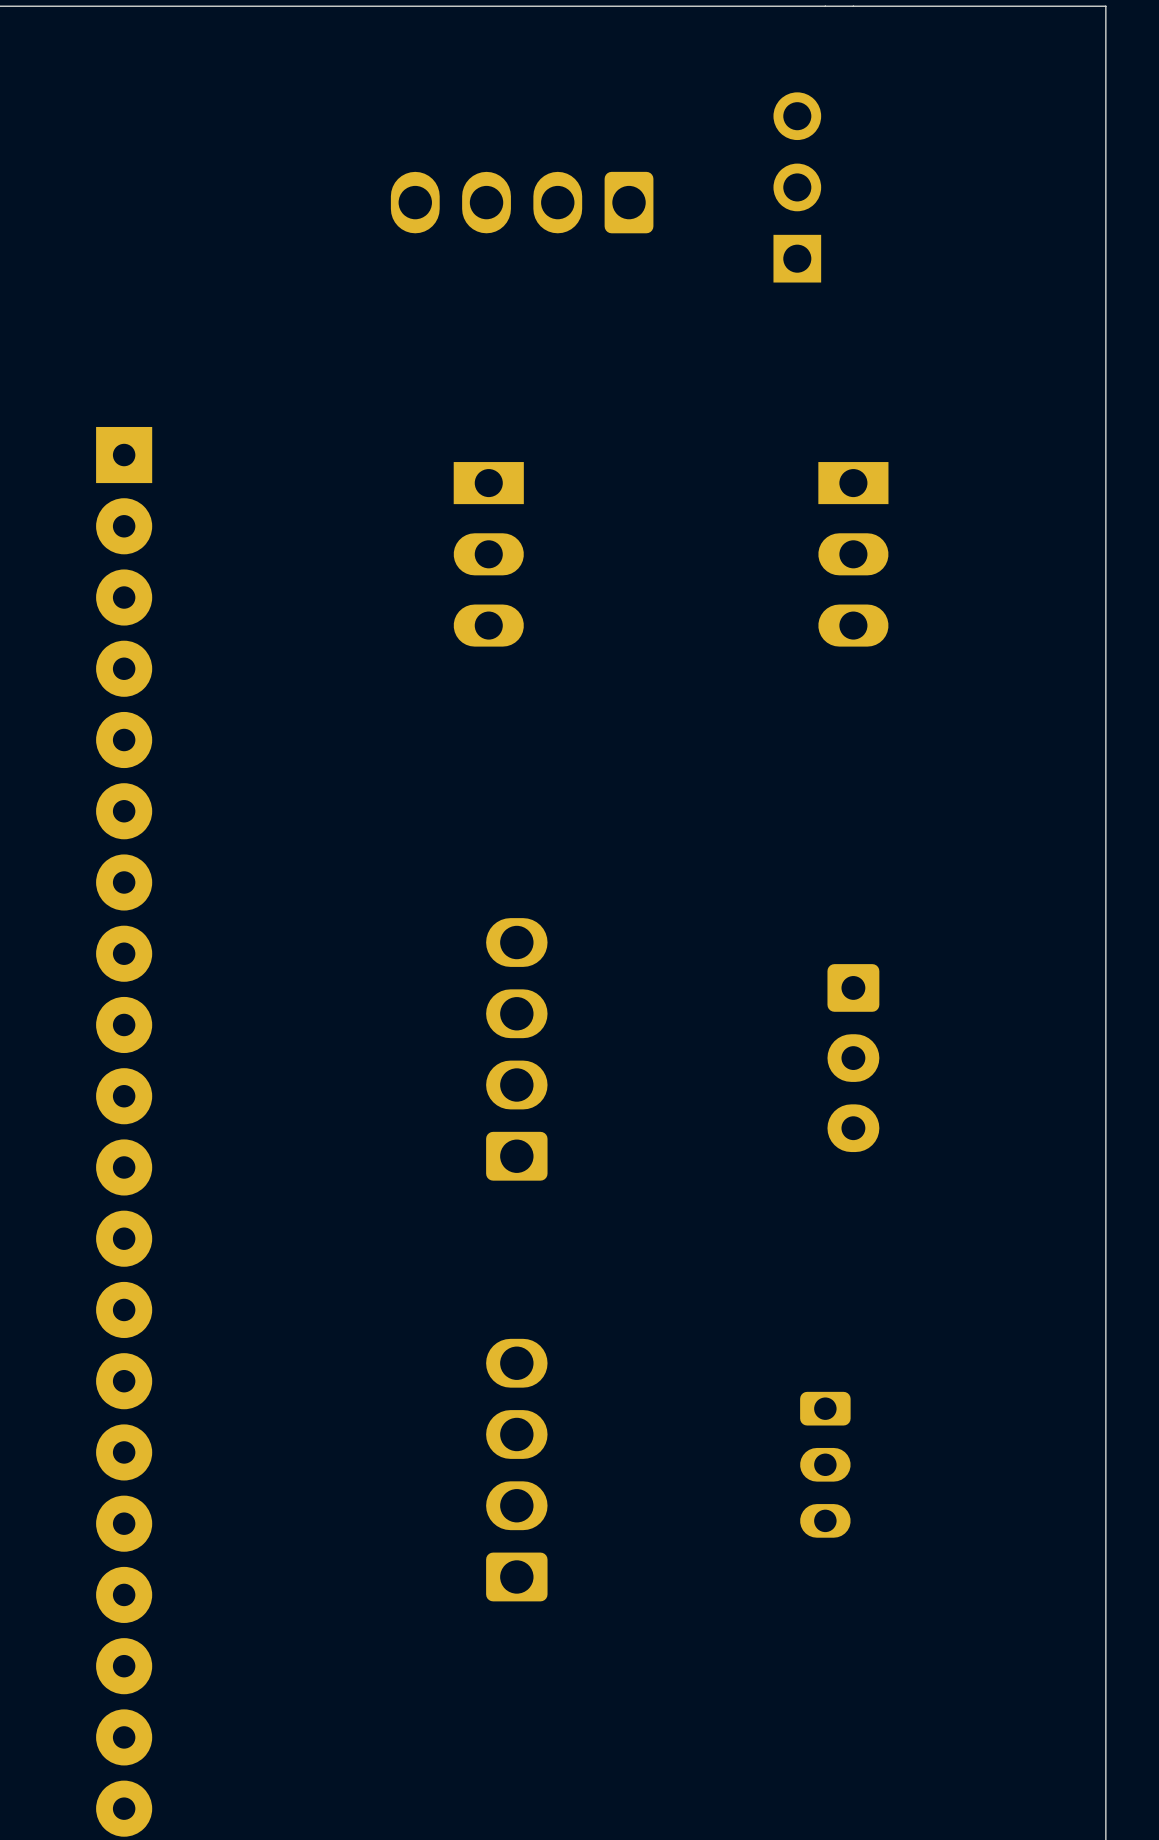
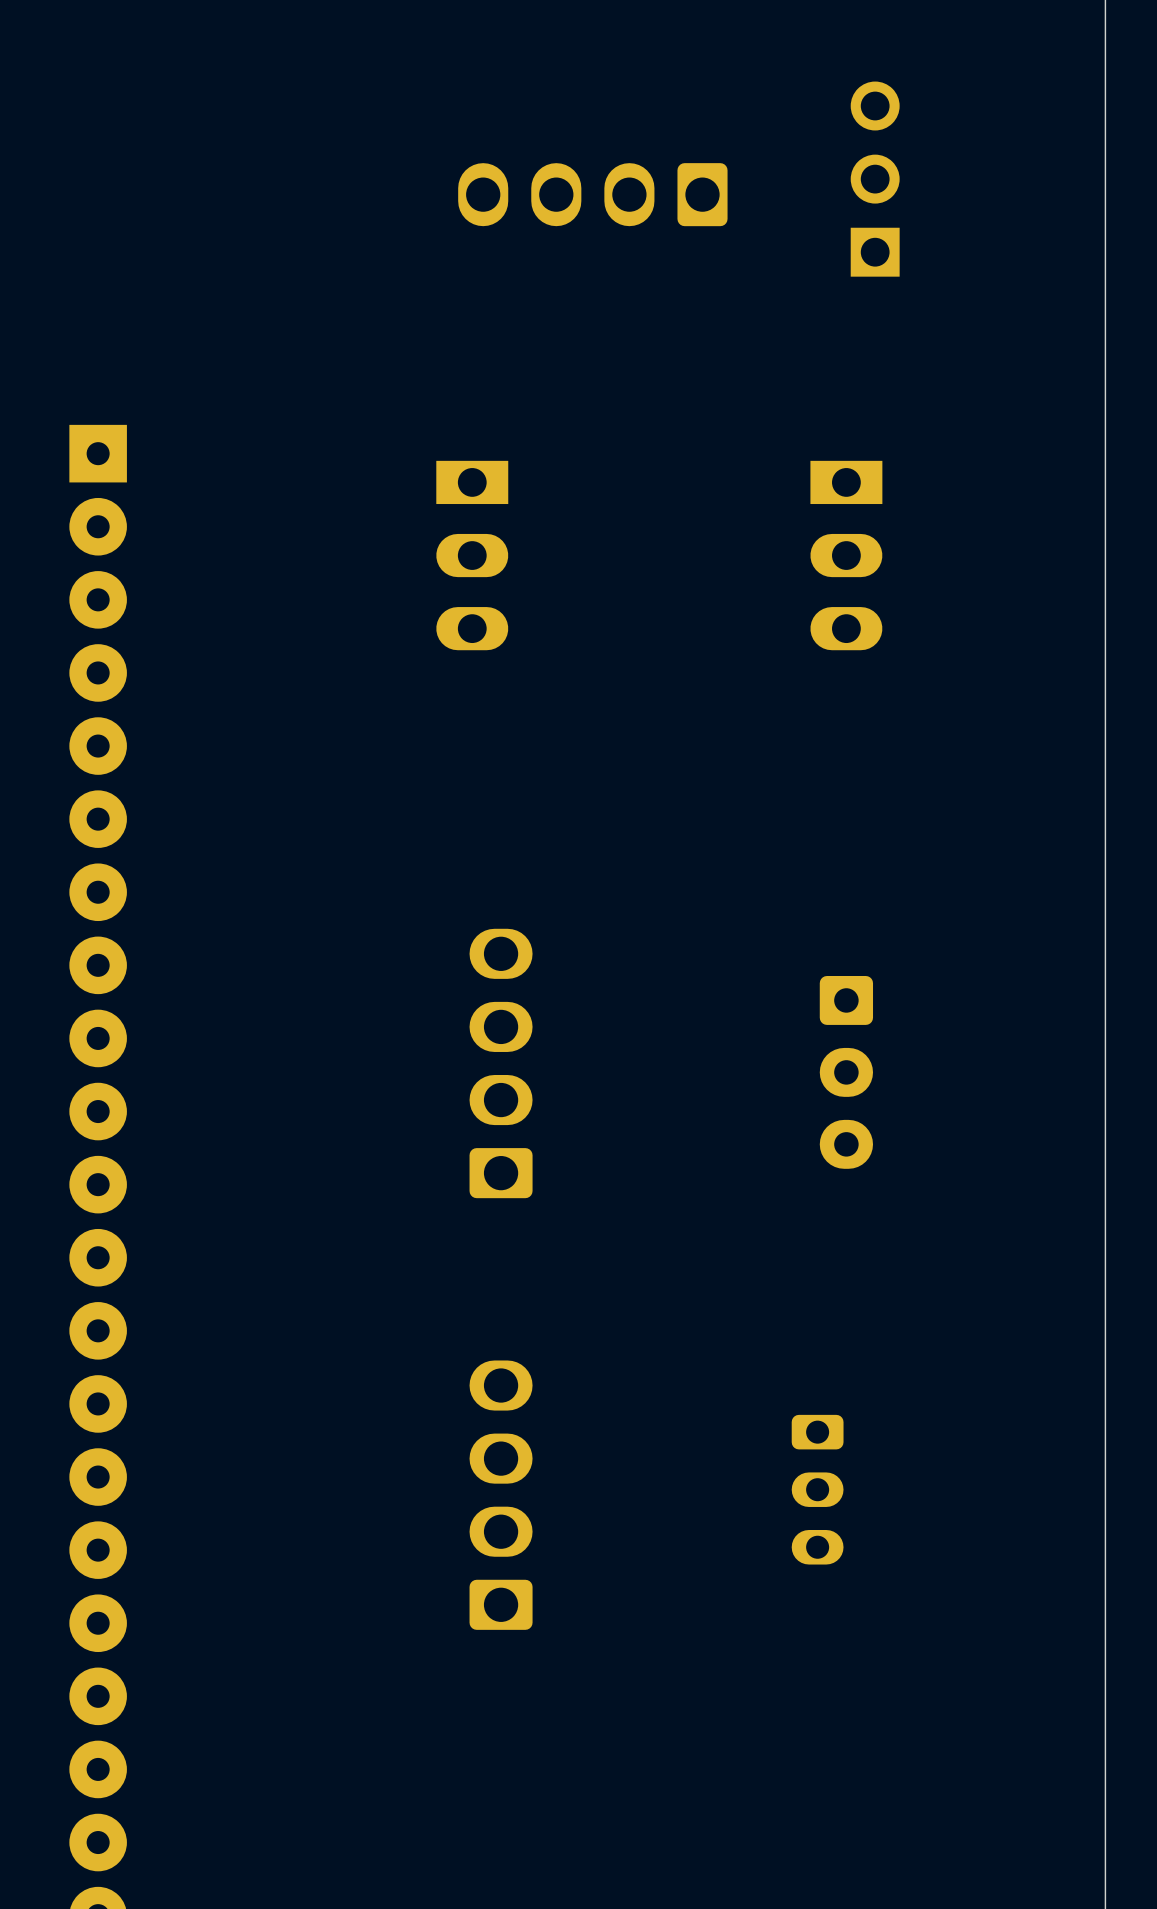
part position: (797, 187) -> (875, 179)
part position: (522, 202) -> (592, 194)

